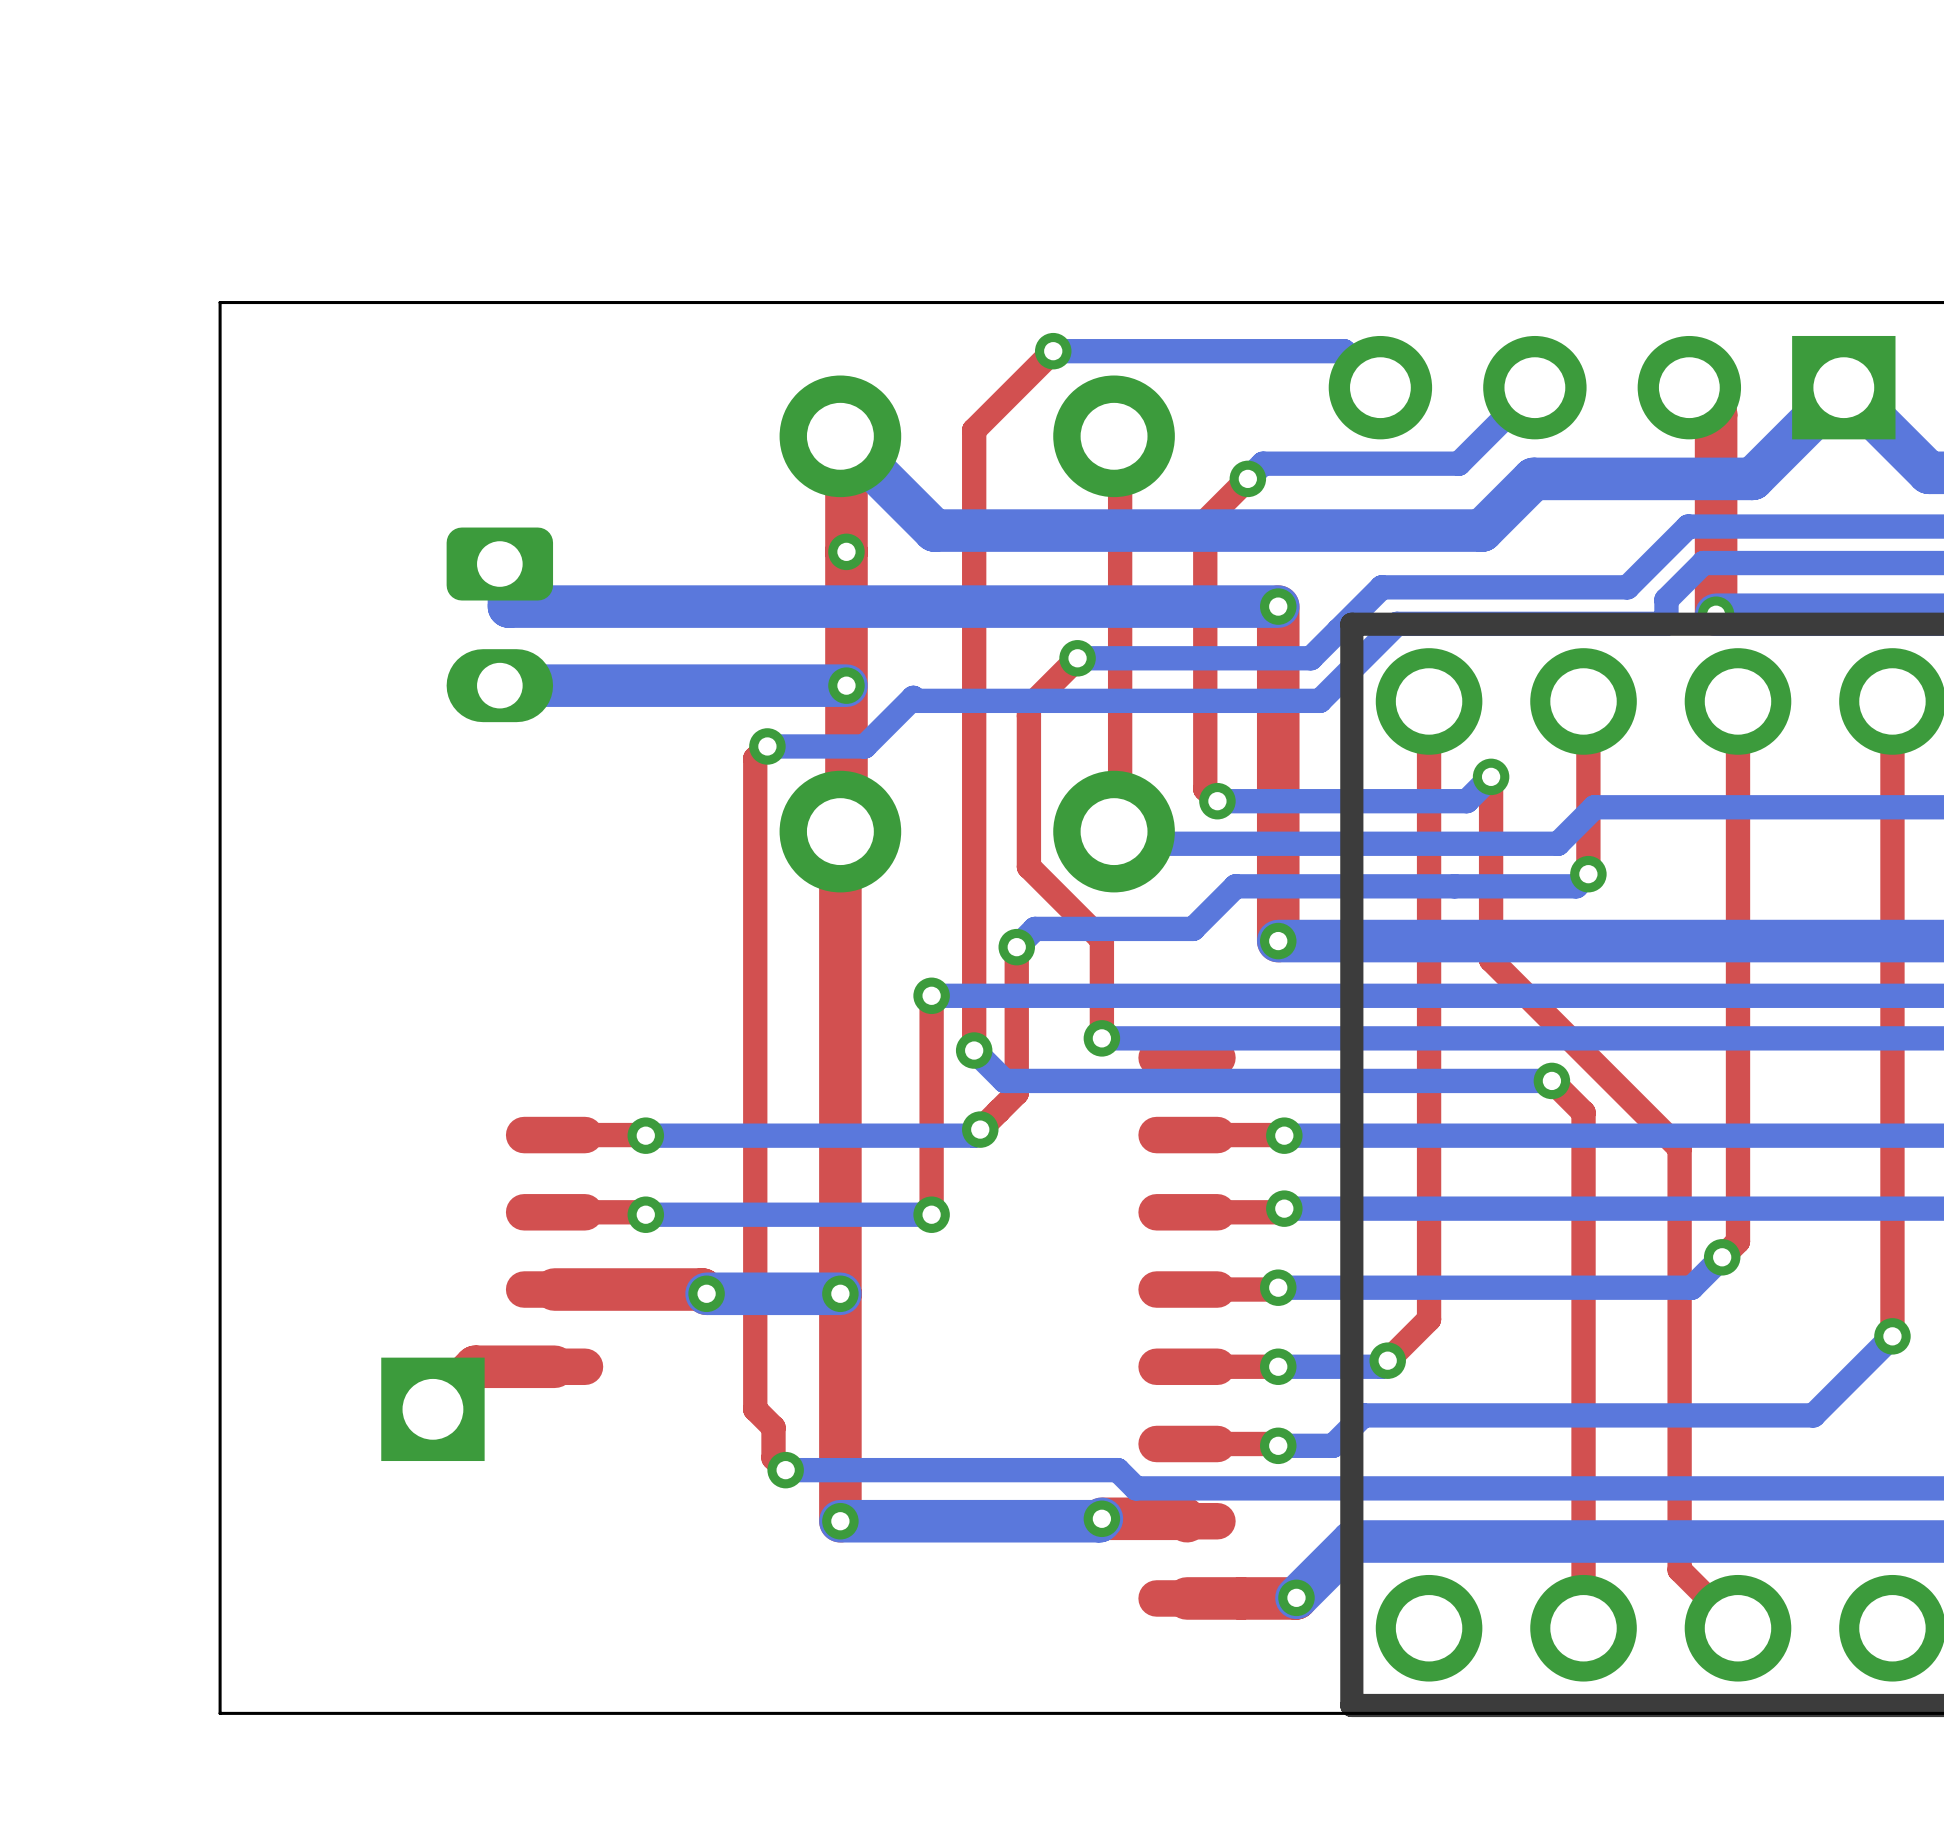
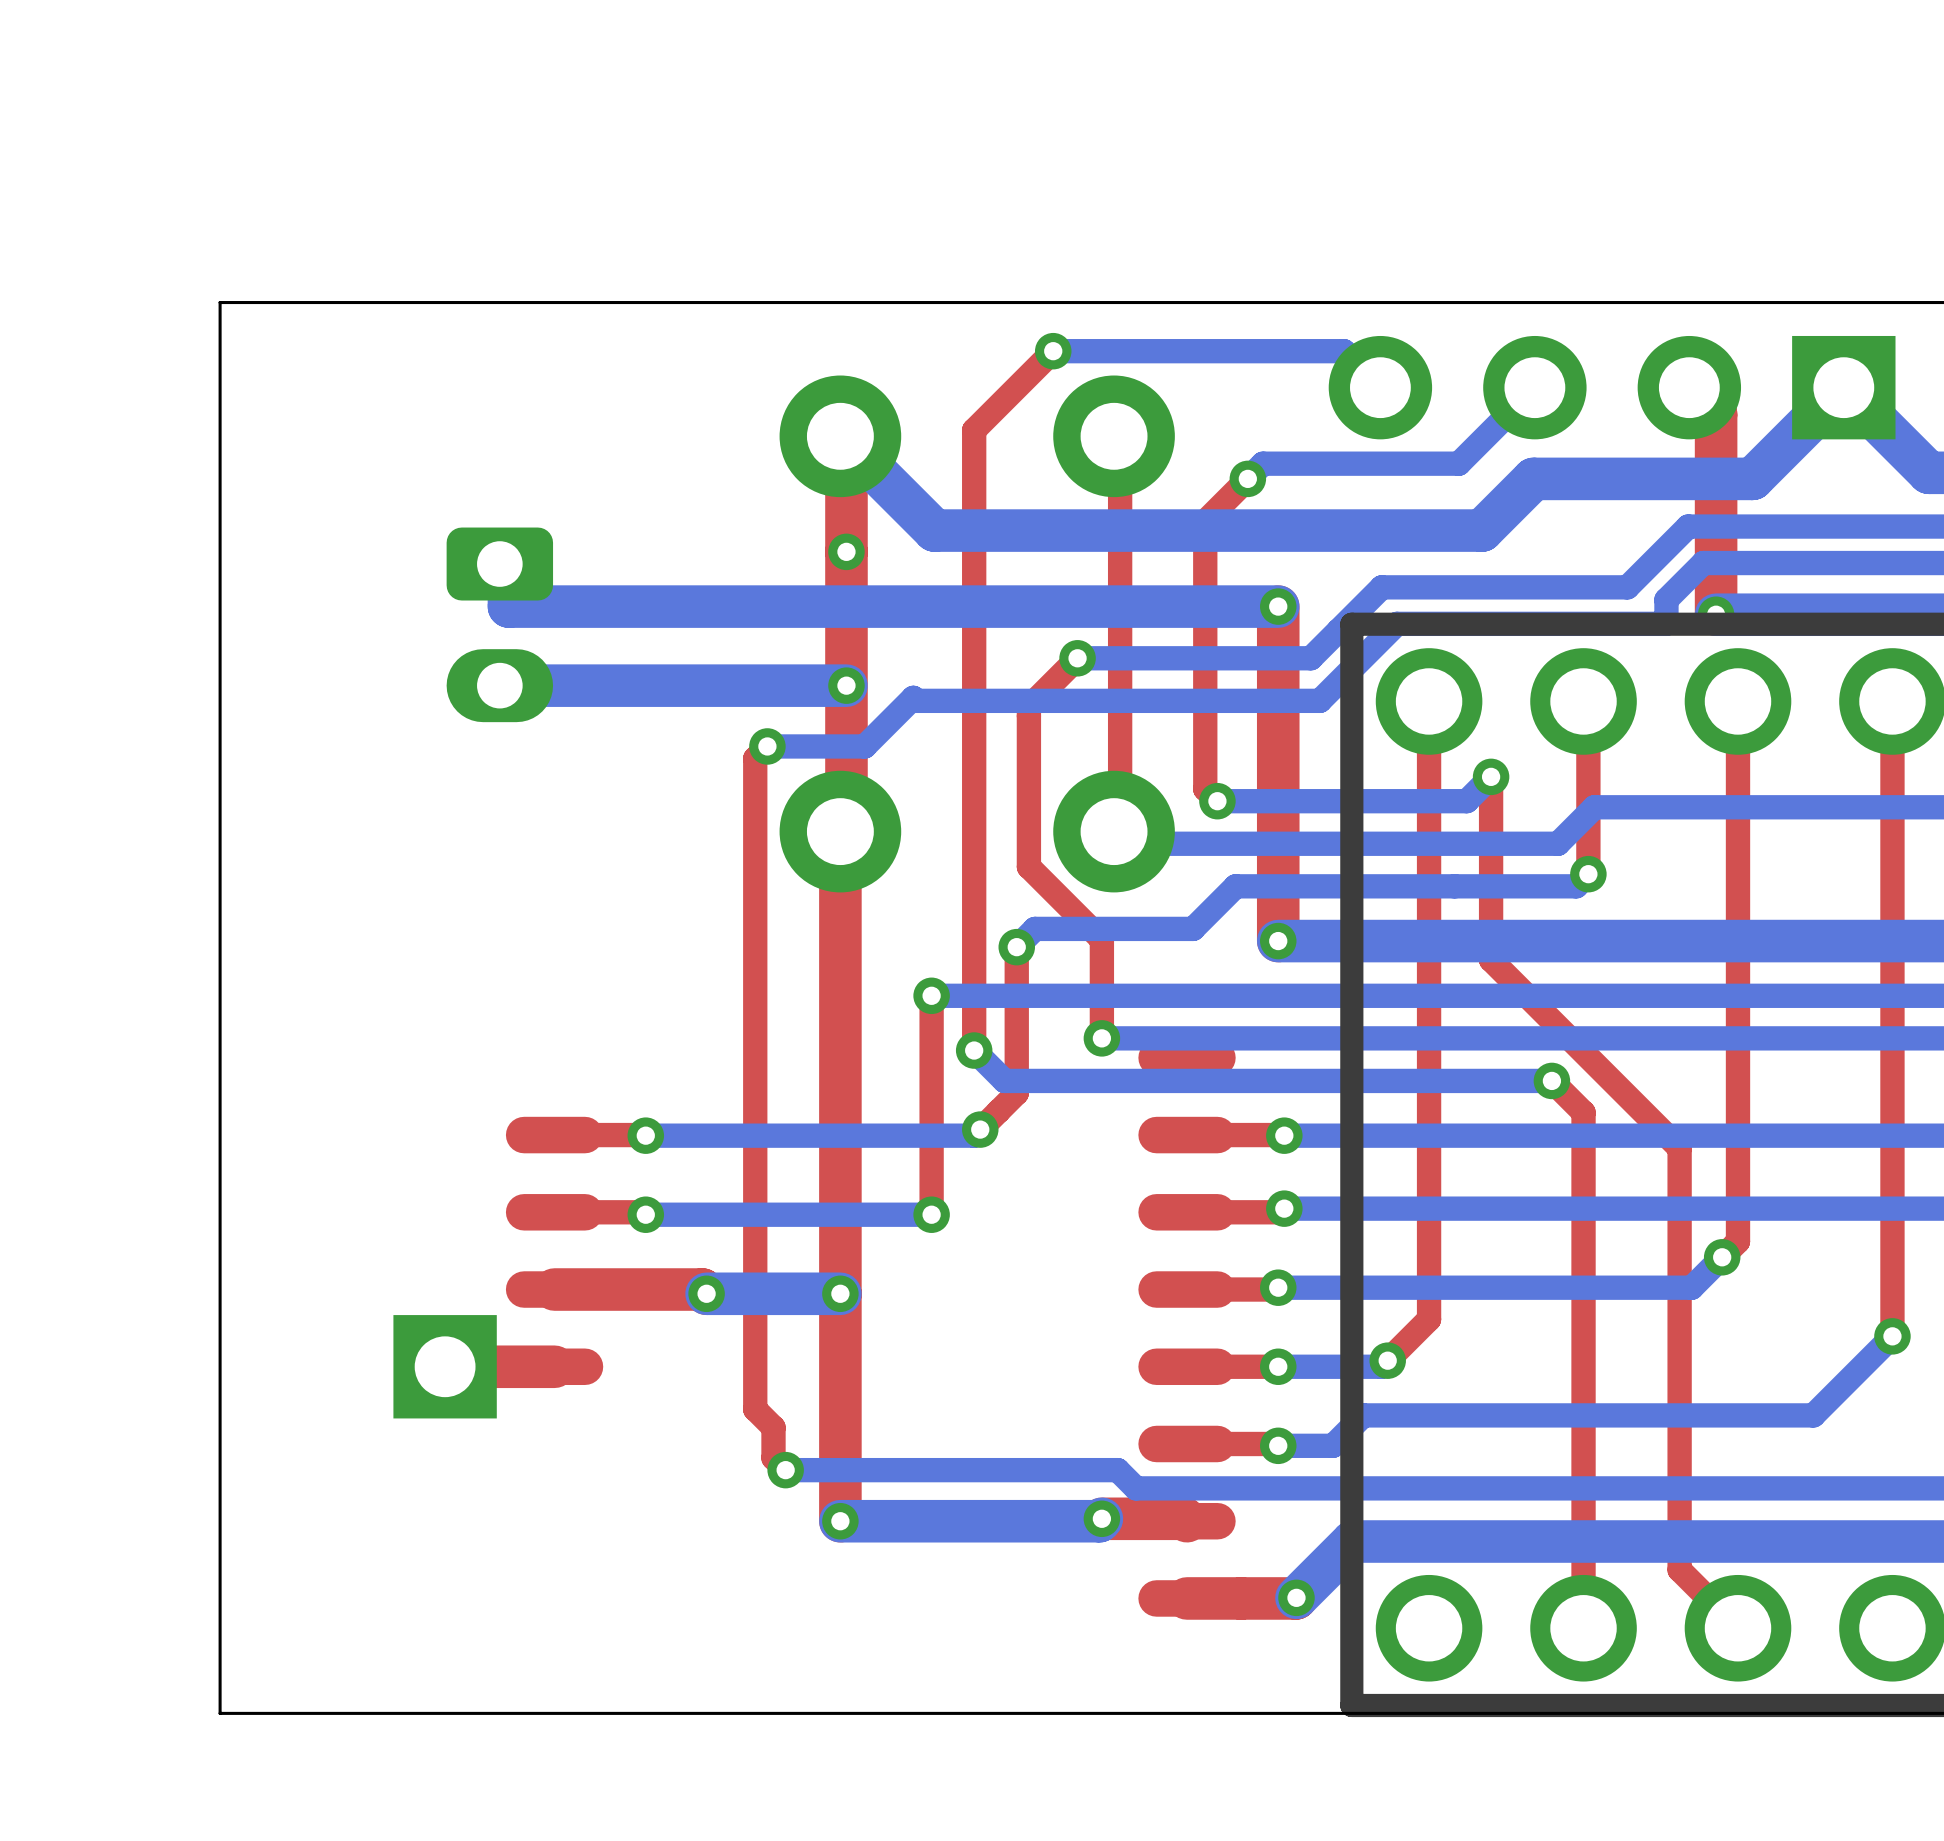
part position: (432, 1409) -> (445, 1366)

